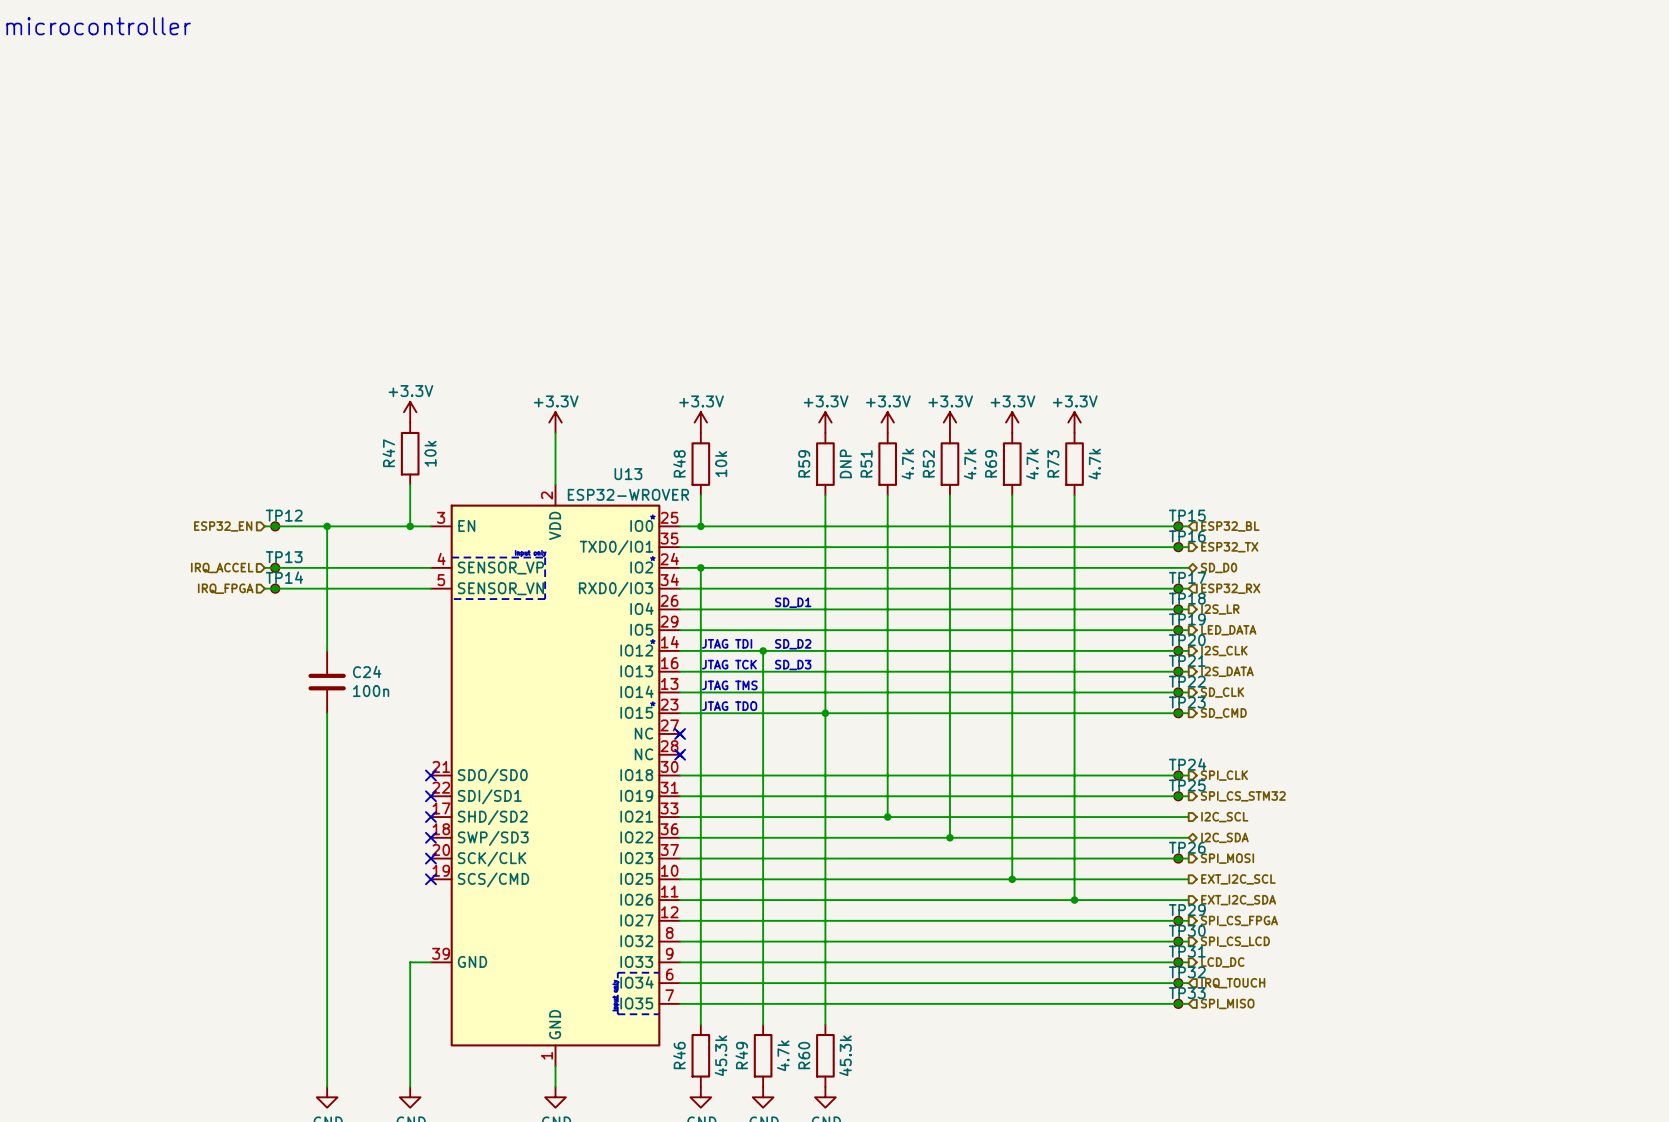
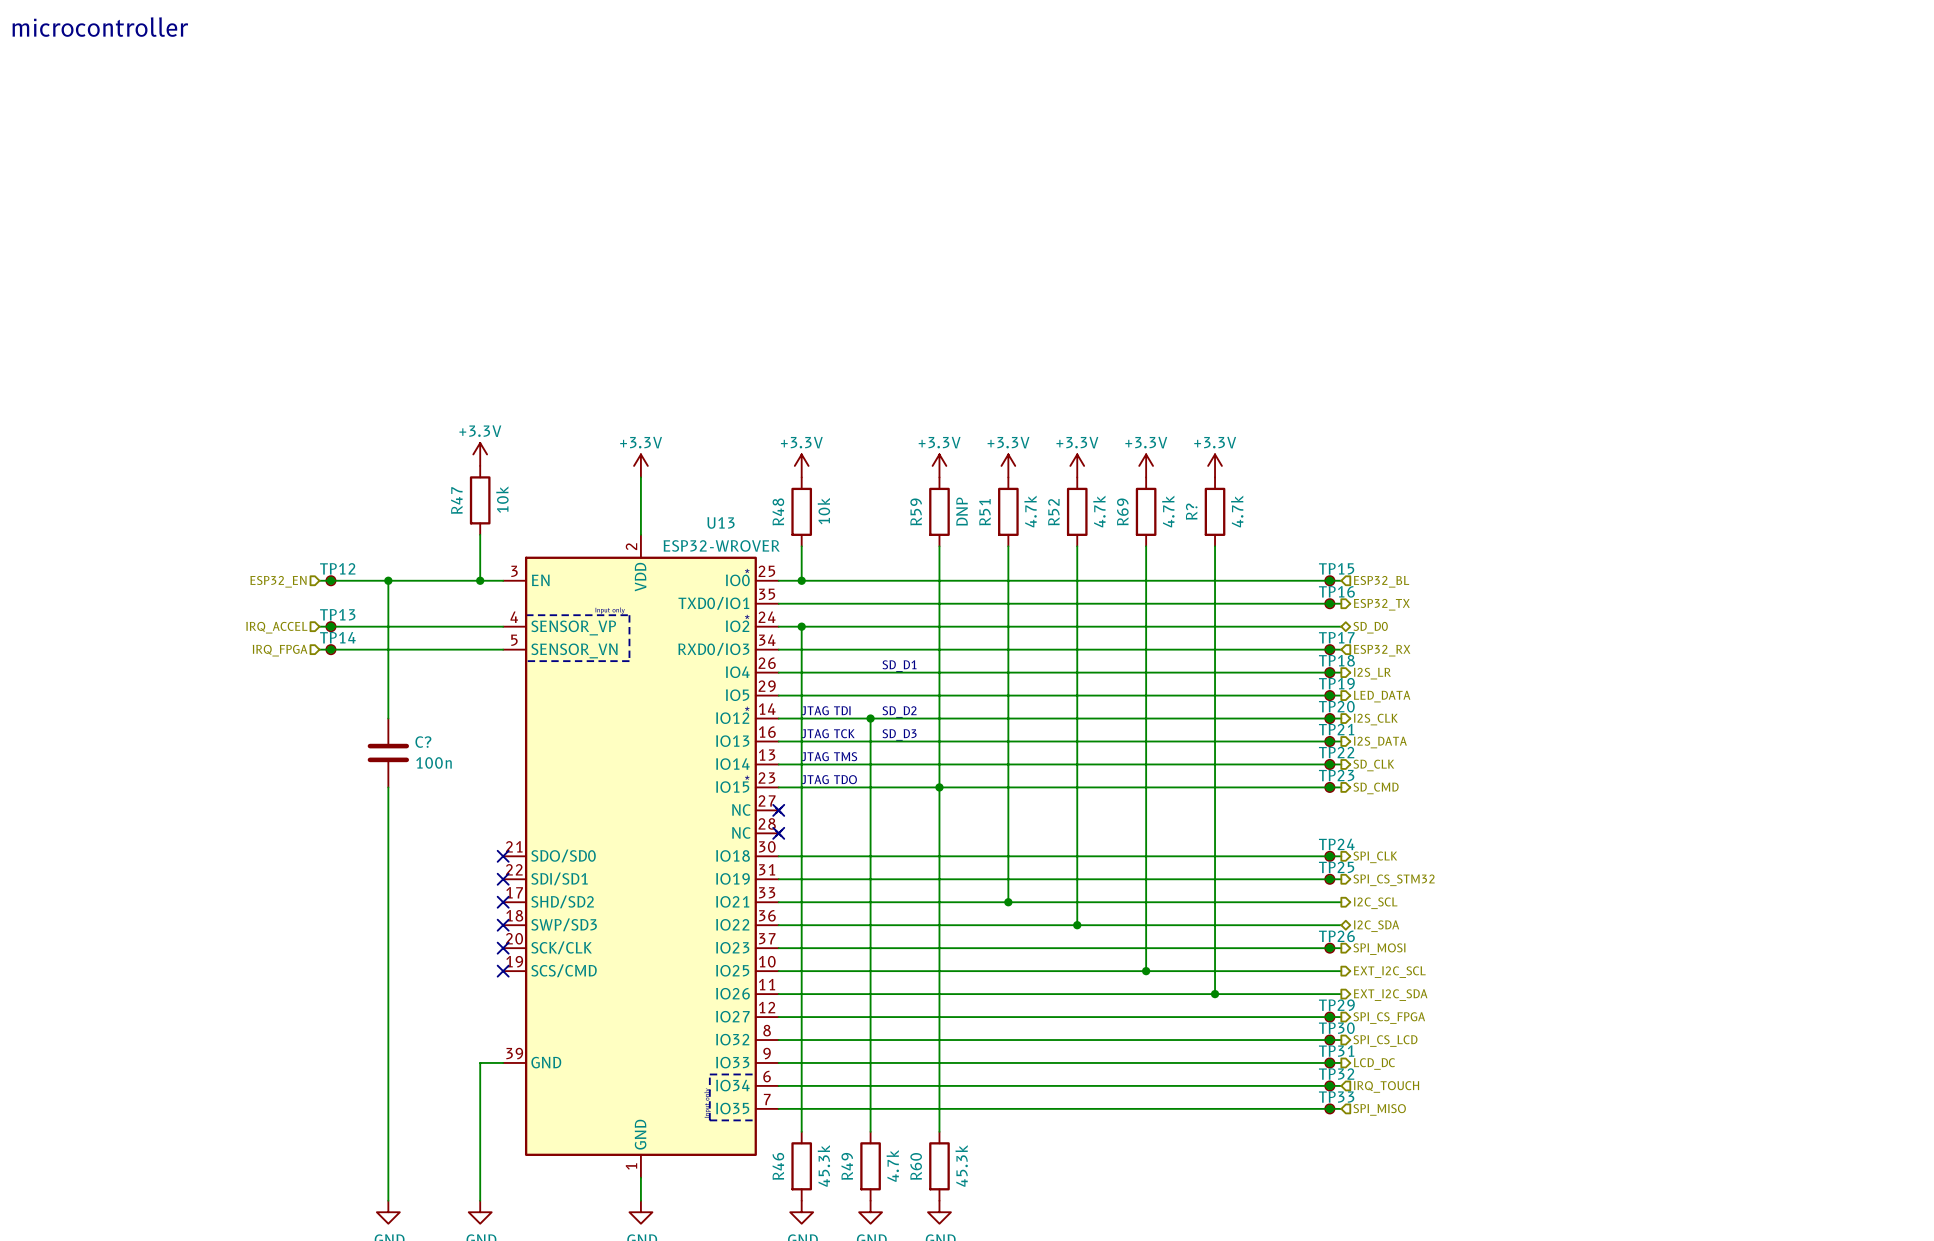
R73 name: R73 (1053, 463) -> R? (1191, 511)
C24 name: C24 (367, 671) -> C? (423, 742)

